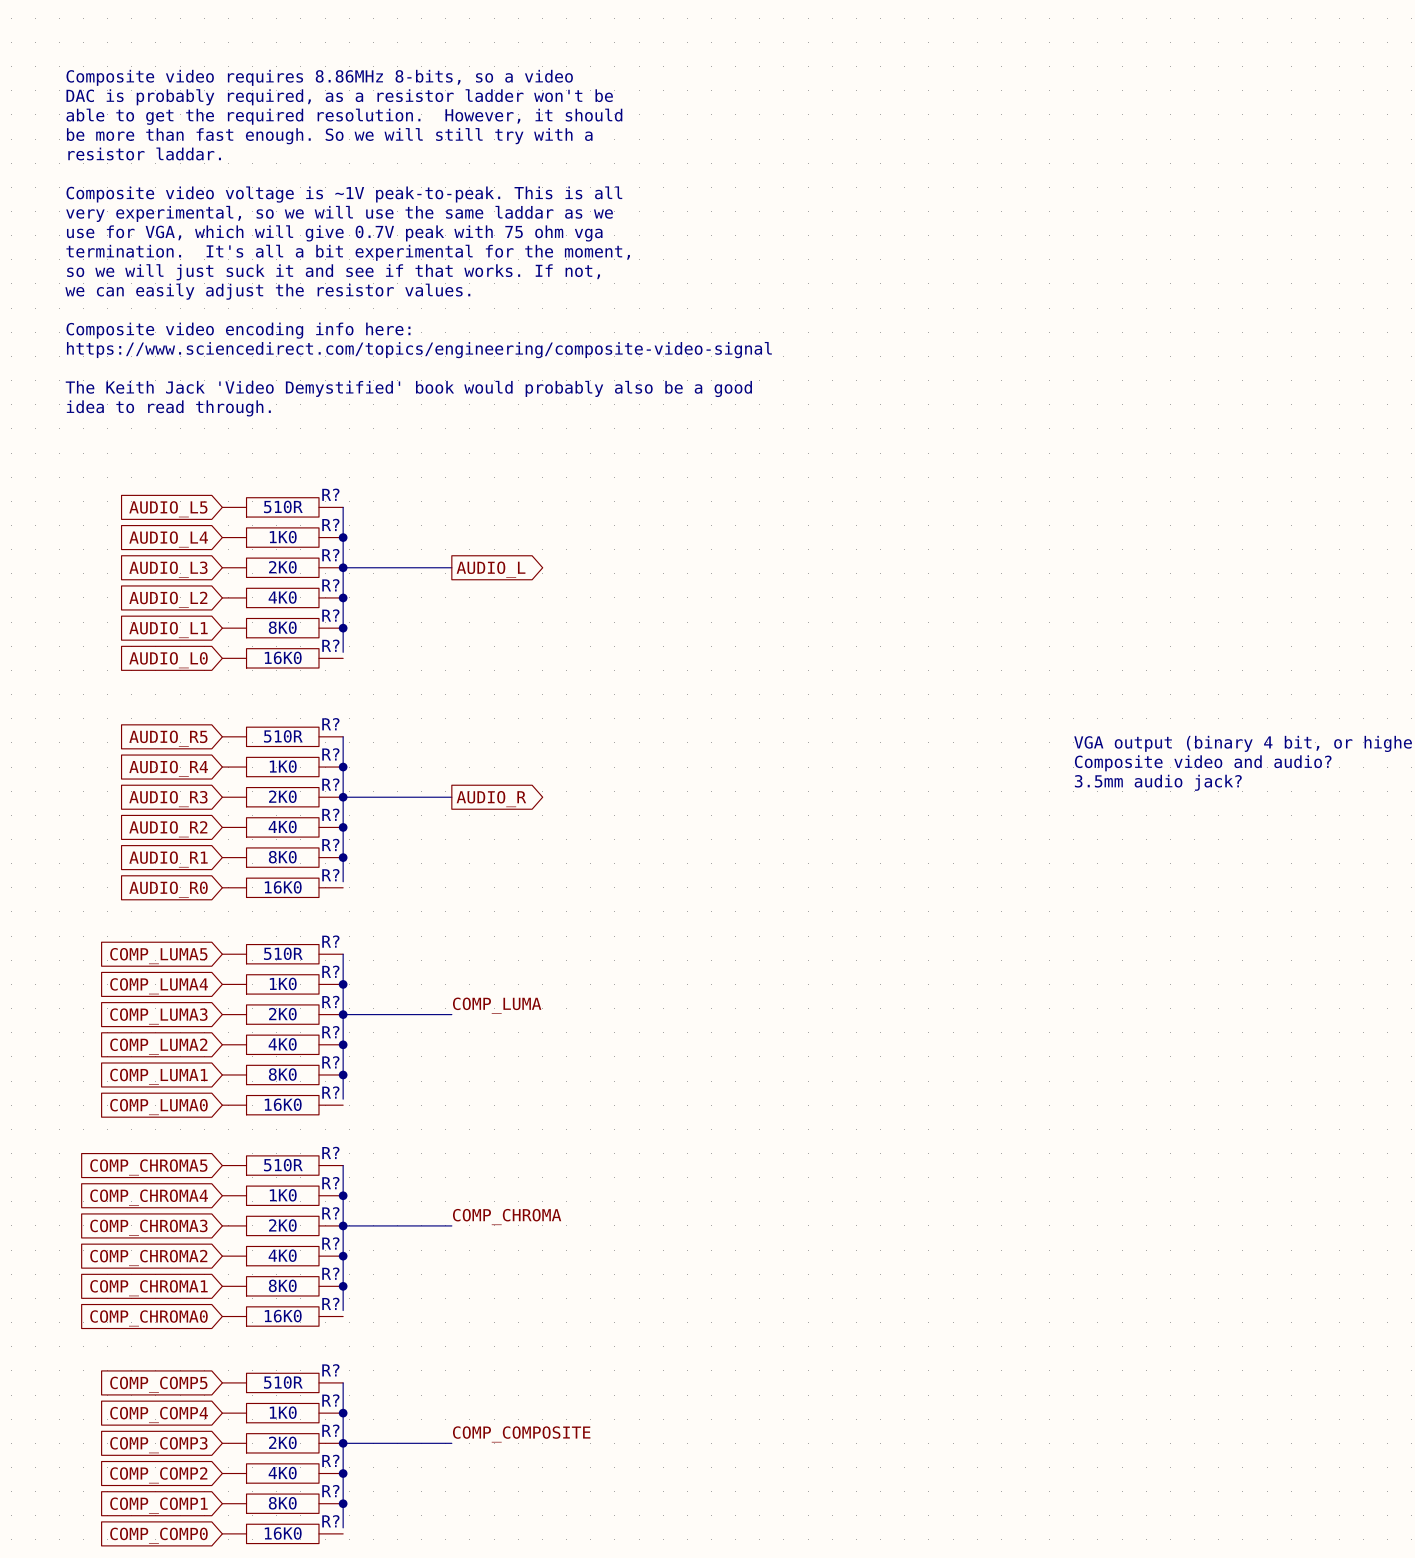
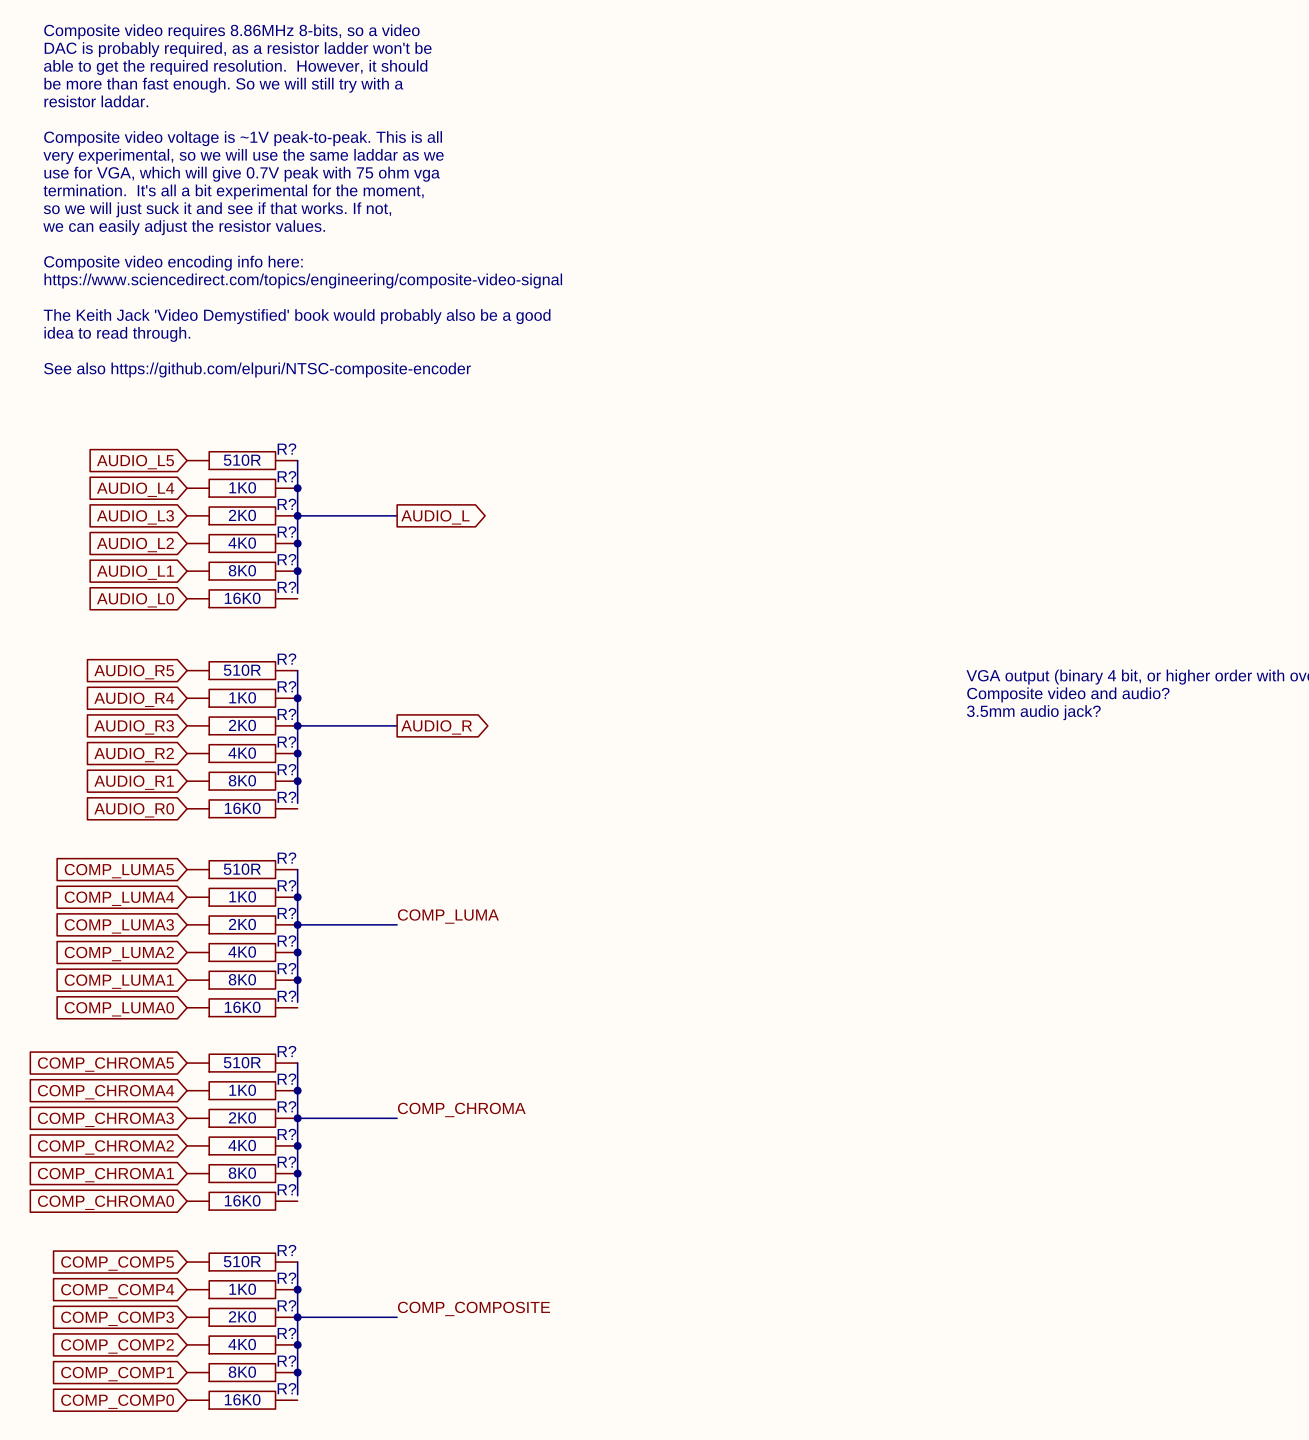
text: none -> Composite video requires 8.86MHz 8-bits, so a video (231, 31)
text: none -> DAC is probably required, as a resistor ladder won't be (238, 49)
text: Composite video requires 8.86MHz 8-bits, so a video (319, 77) -> able to get the required resolution. However, it should (235, 67)
text: DAC is probably required, as a resistor ladder won't be (339, 97) -> be more than fast enough. So we will still try with a (223, 85)
text: able to get the required resolution. However, it should (344, 116) -> resistor laddar. (96, 101)
text: be more than fast enough. So we will still try with a (329, 136) -> none
text: resistor laddar. (144, 153) -> Composite video voltage is ~1V peak-to-peak. This is all (243, 138)
text: none -> very experimental, so we will use the same laddar as we (243, 156)
text: Composite video voltage is ~1V peak-to-peak. This is all (344, 194) -> use for VGA, which will give 0.7V peak with 75 ohm vga (242, 174)
text: very experimental, so we will use the same laddar as we (339, 213) -> termination. It's all a bit experimental for the moment, (233, 192)
text: use for VGA, which will give 0.7V peak with 75 ohm vga (334, 233) -> so we will just suck it and see if that works. If not, (217, 209)
text: termination. It's all a bit experimental for the moment, (348, 252) -> we can easily adjust the resistor values. (184, 227)
text: so we will just suck it and see if that works. If not, (333, 272) -> none
text: we can easily adjust the resistor values. (267, 291) -> Composite video encoding info here: (173, 263)
text: none -> https://www.sciencedirect.com/topics/engineering/composite-video-signal (303, 281)
text: Composite video encoding info here: (238, 330) -> none
text: https://www.sciencedirect.com/topics/engineering/composite-video-signal (419, 350) -> The Keith Jack 'Video Demystified' book would probably also be a good (297, 316)
text: none -> idea to read through. (117, 334)
text: The Keith Jack 'Video Demystified' book would probably also be a good (408, 388) -> none
text: idea to read through. (168, 408) -> See also https://github.com/elpuri/NTSC-composite-encoder (257, 370)

